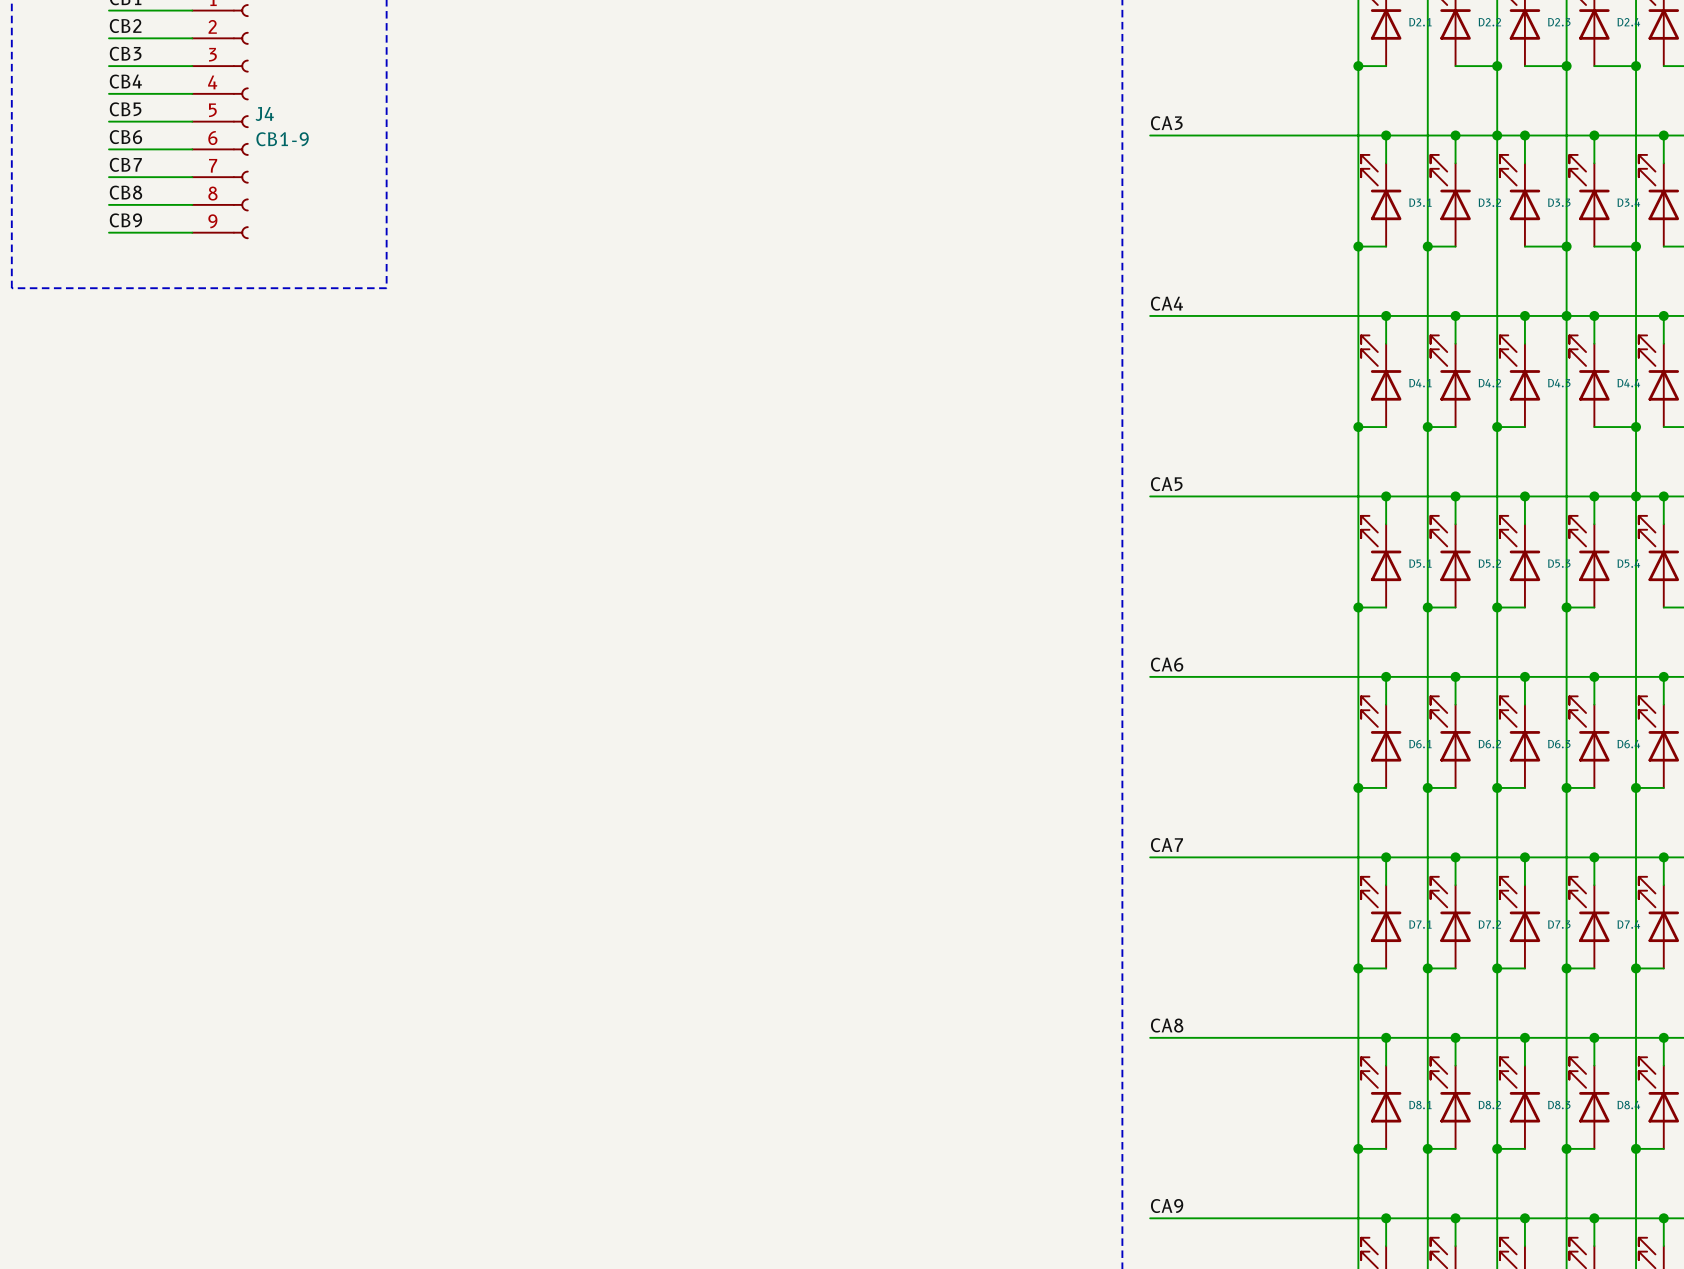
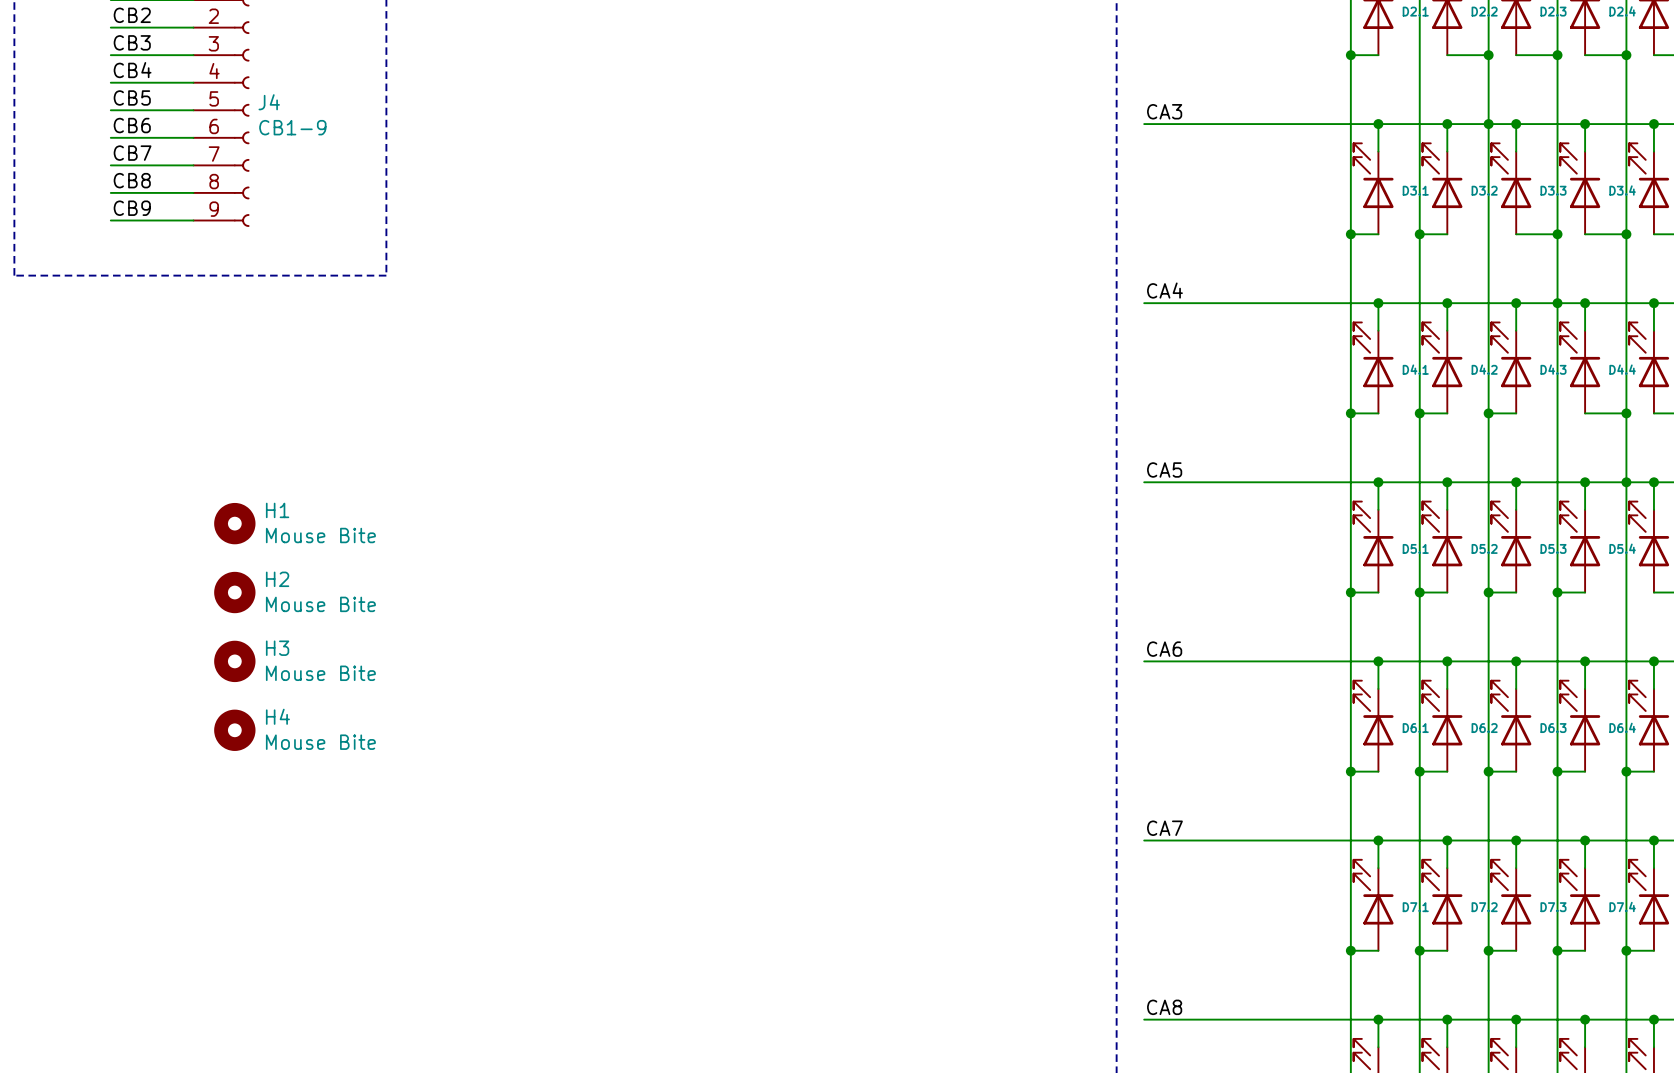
H1: none -> Mouse Bite (234, 523)
H2: none -> Mouse Bite (234, 592)
H3: none -> Mouse Bite (234, 661)
H4: none -> Mouse Bite (234, 730)

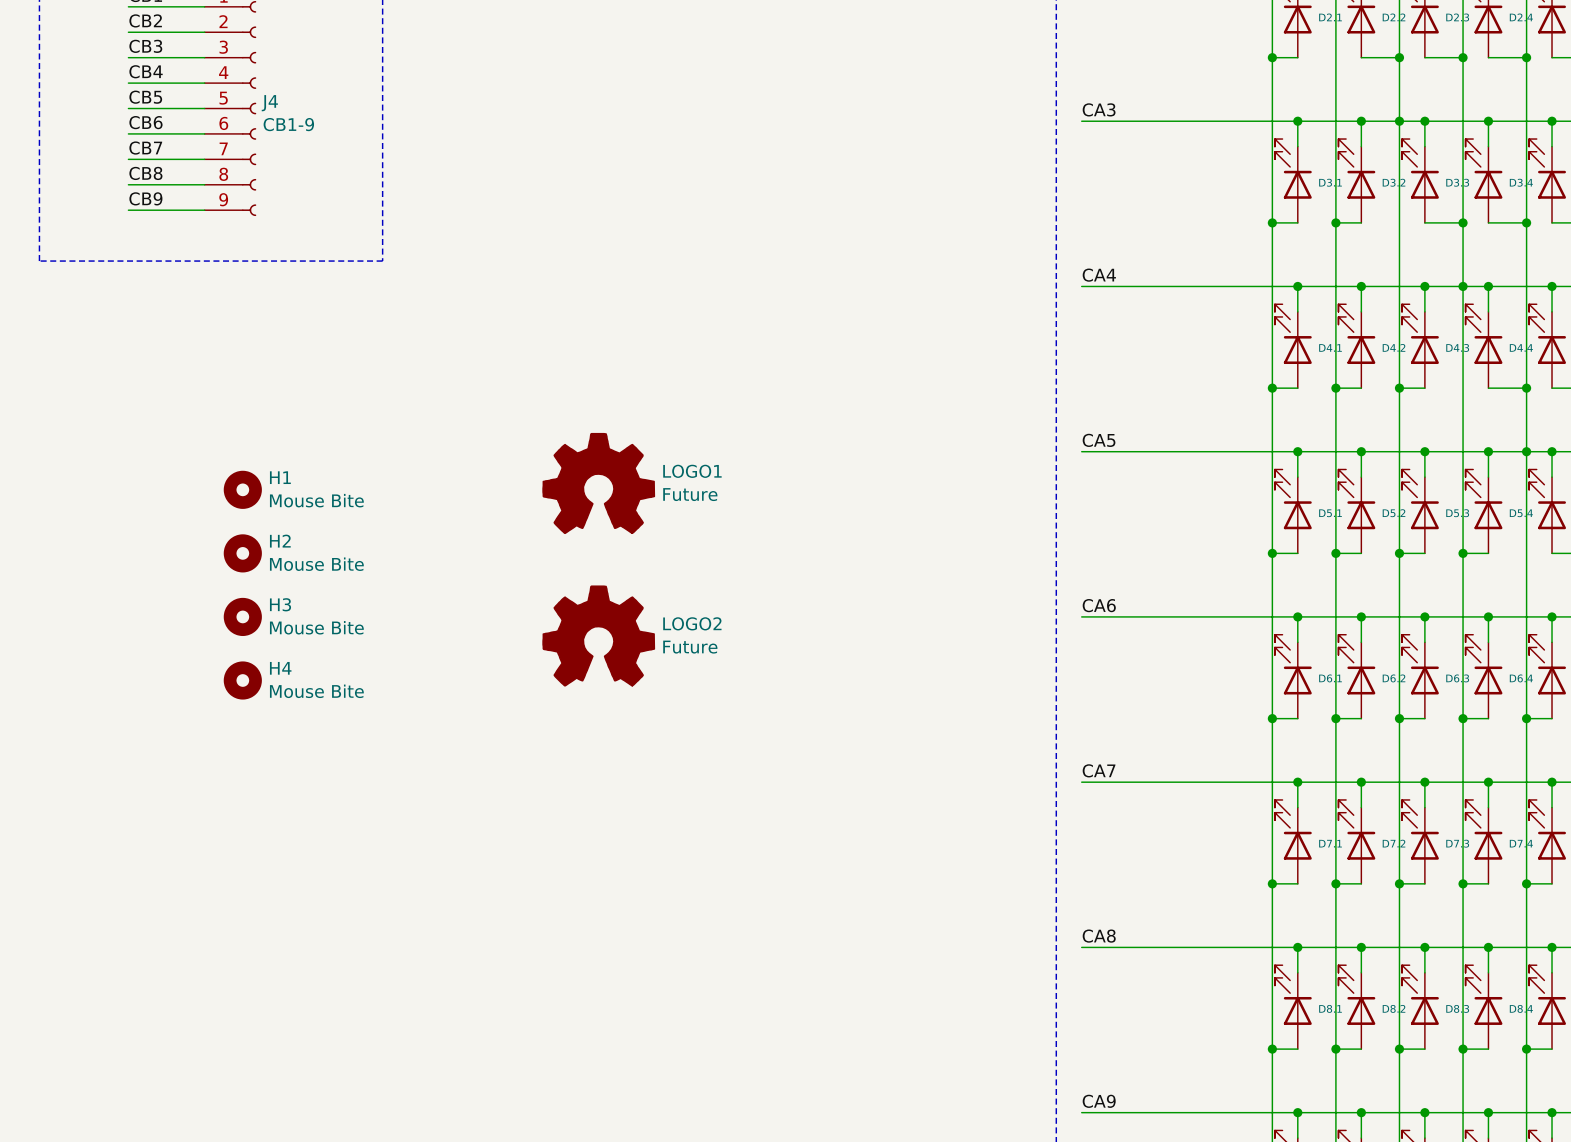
LOGO1: none -> Future (598, 483)
LOGO2: none -> Future (598, 636)

